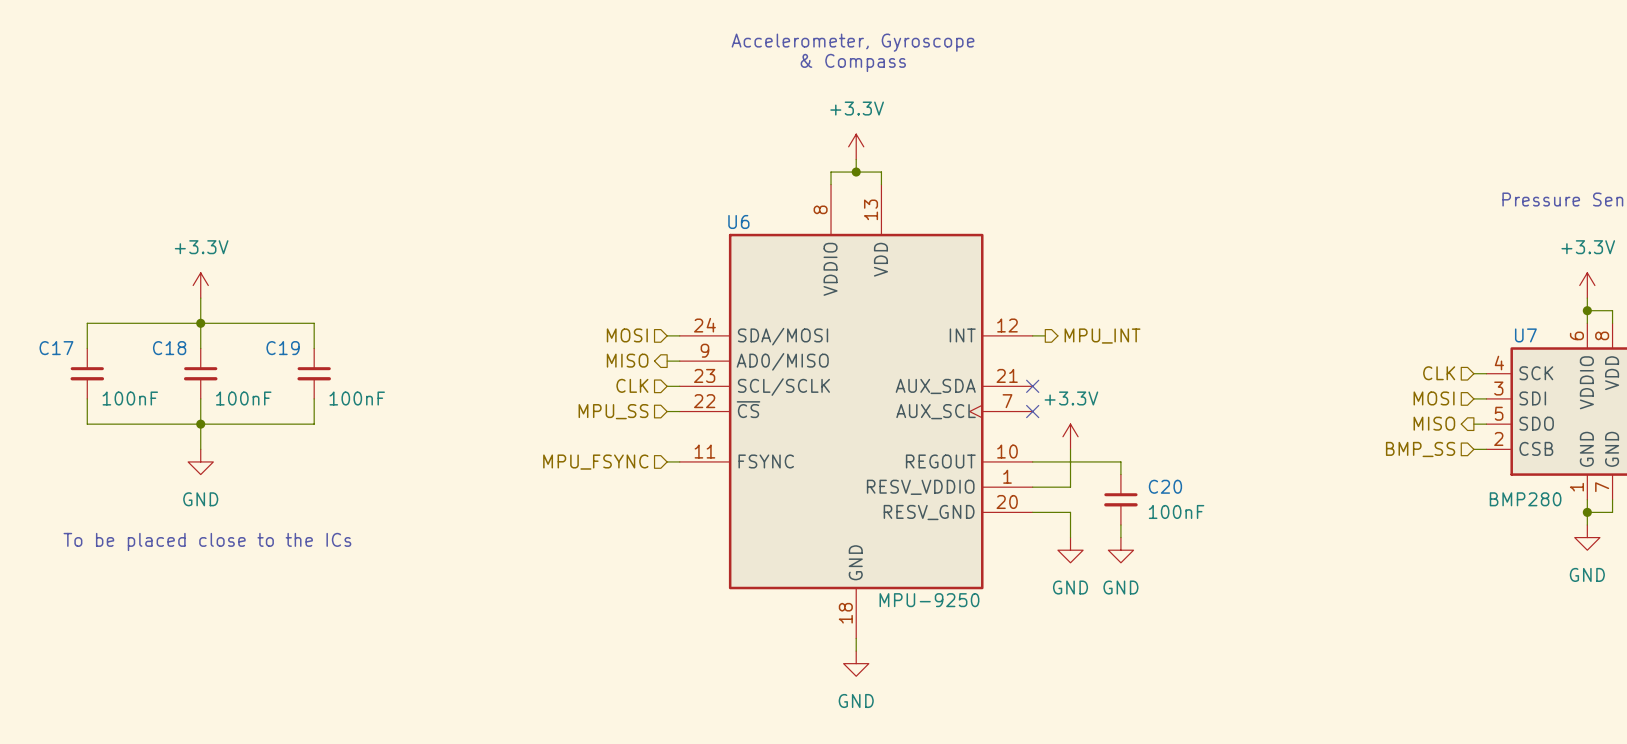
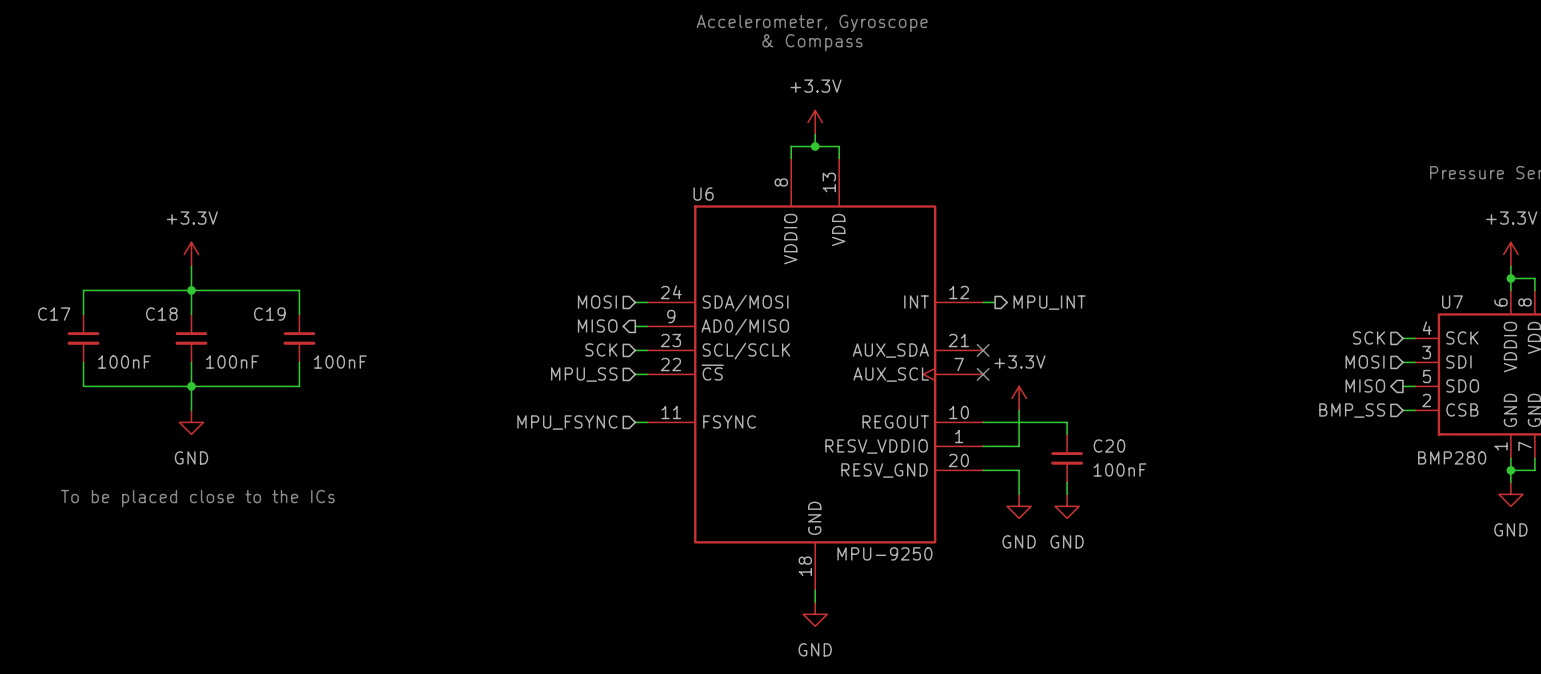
hierarchical label: CLK (1439, 373) -> SCK (1369, 337)
hierarchical label: CLK (632, 385) -> SCK (601, 349)

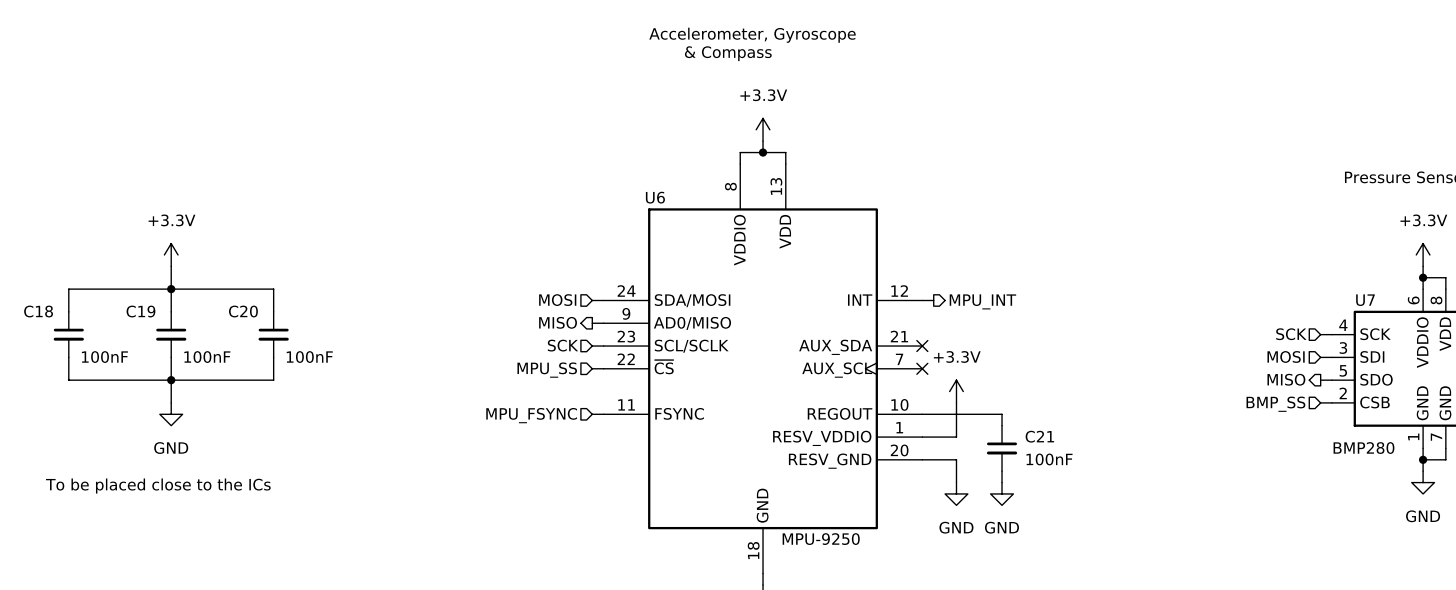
C17 name: C17 (54, 314) -> C18 (38, 311)
C18 name: C18 (161, 314) -> C19 (140, 311)
C19 name: C19 (269, 314) -> C20 (243, 311)
C20 name: C20 (1109, 446) -> C21 (1039, 436)

